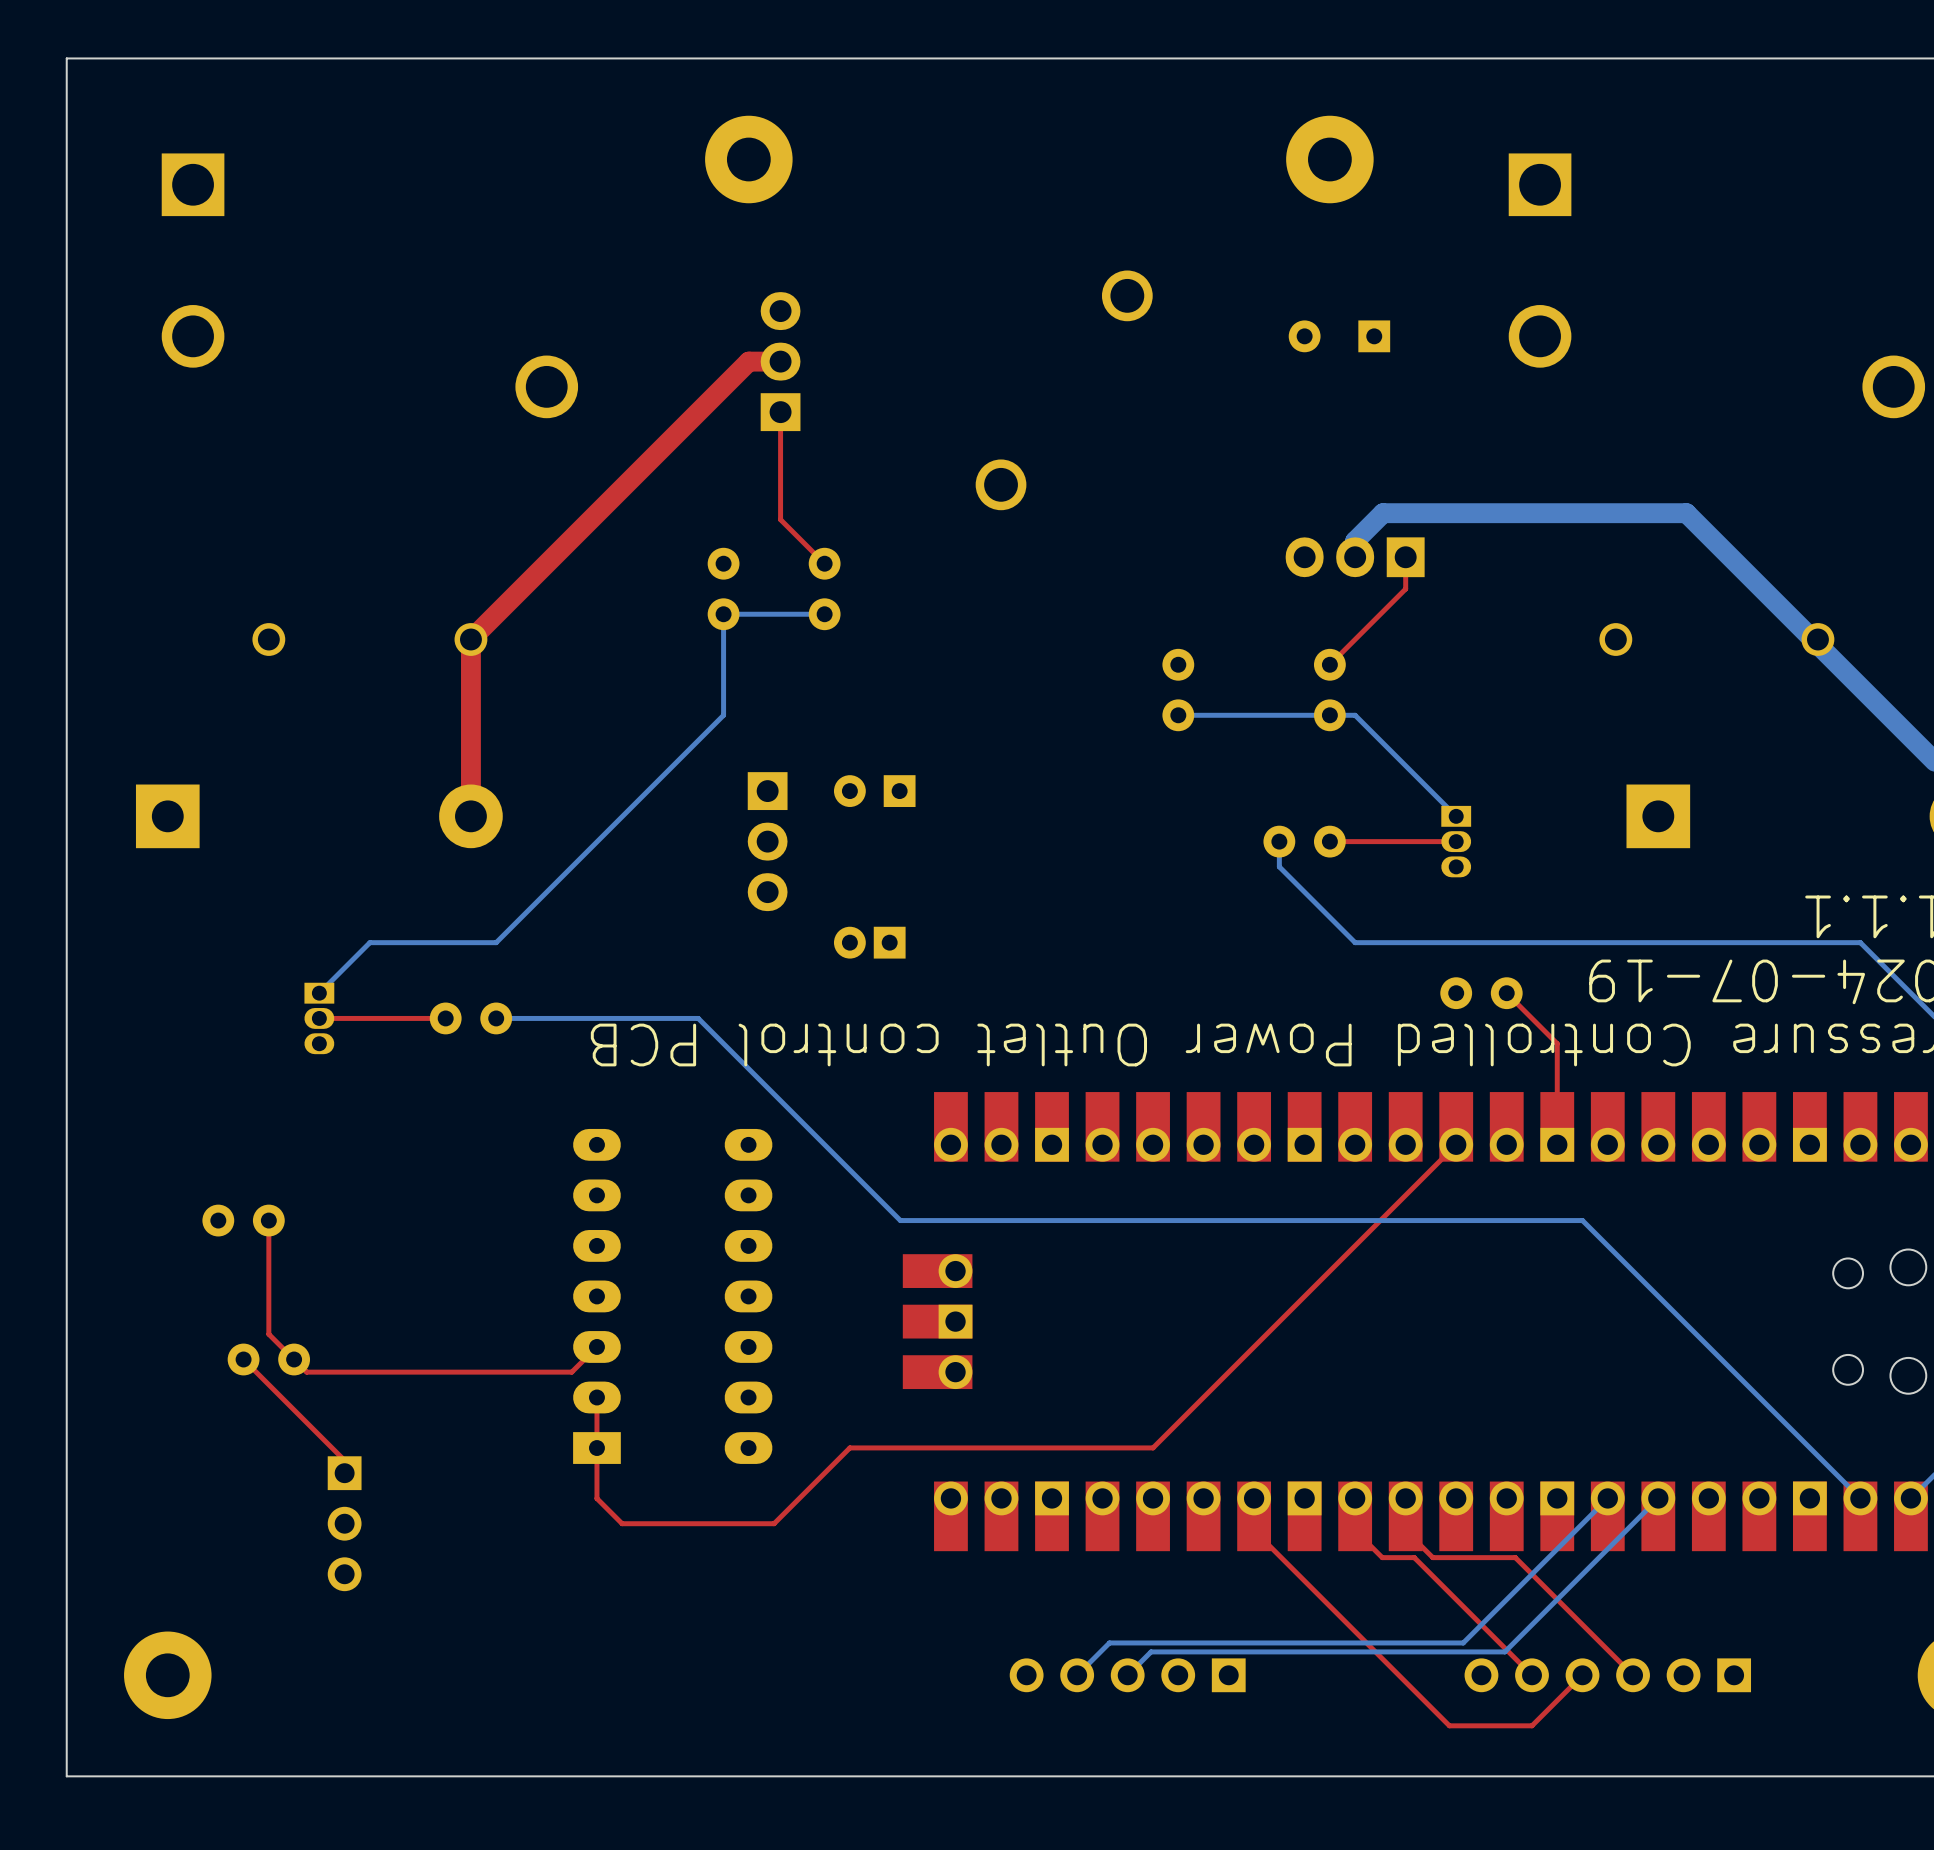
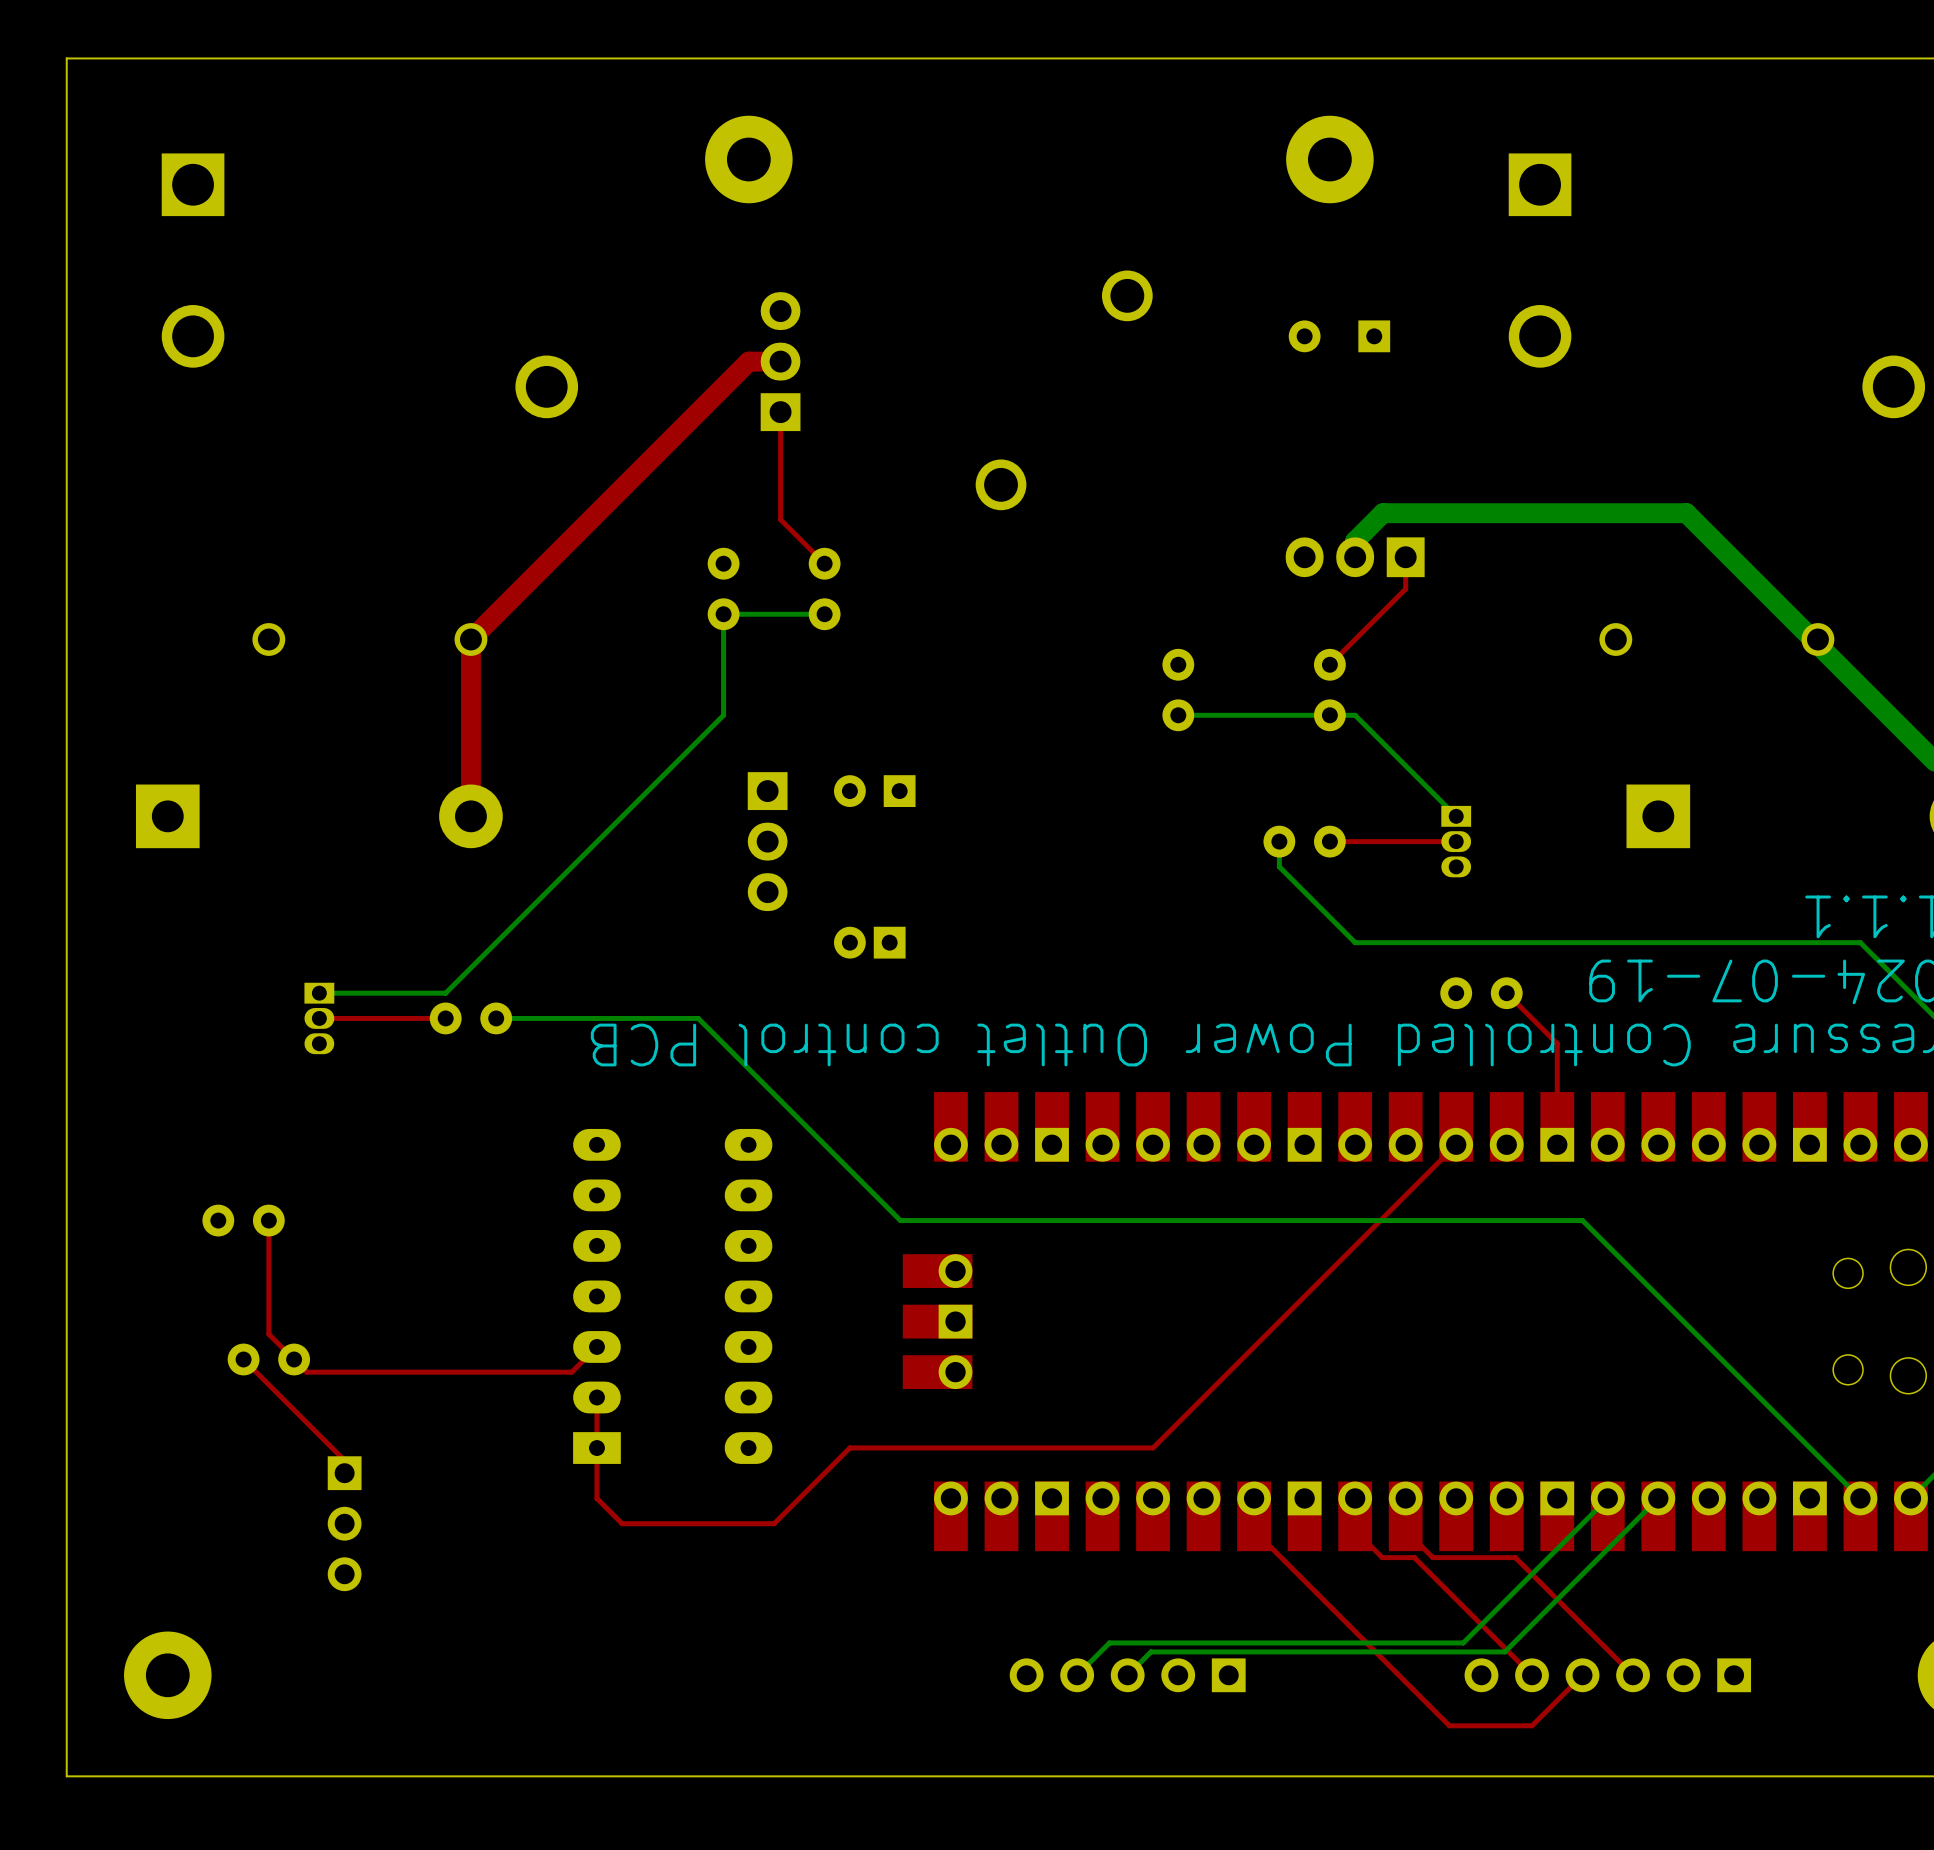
bottom track: (496, 942) (369, 942) (319, 993) -> (496, 942) (445, 993) (319, 993)

